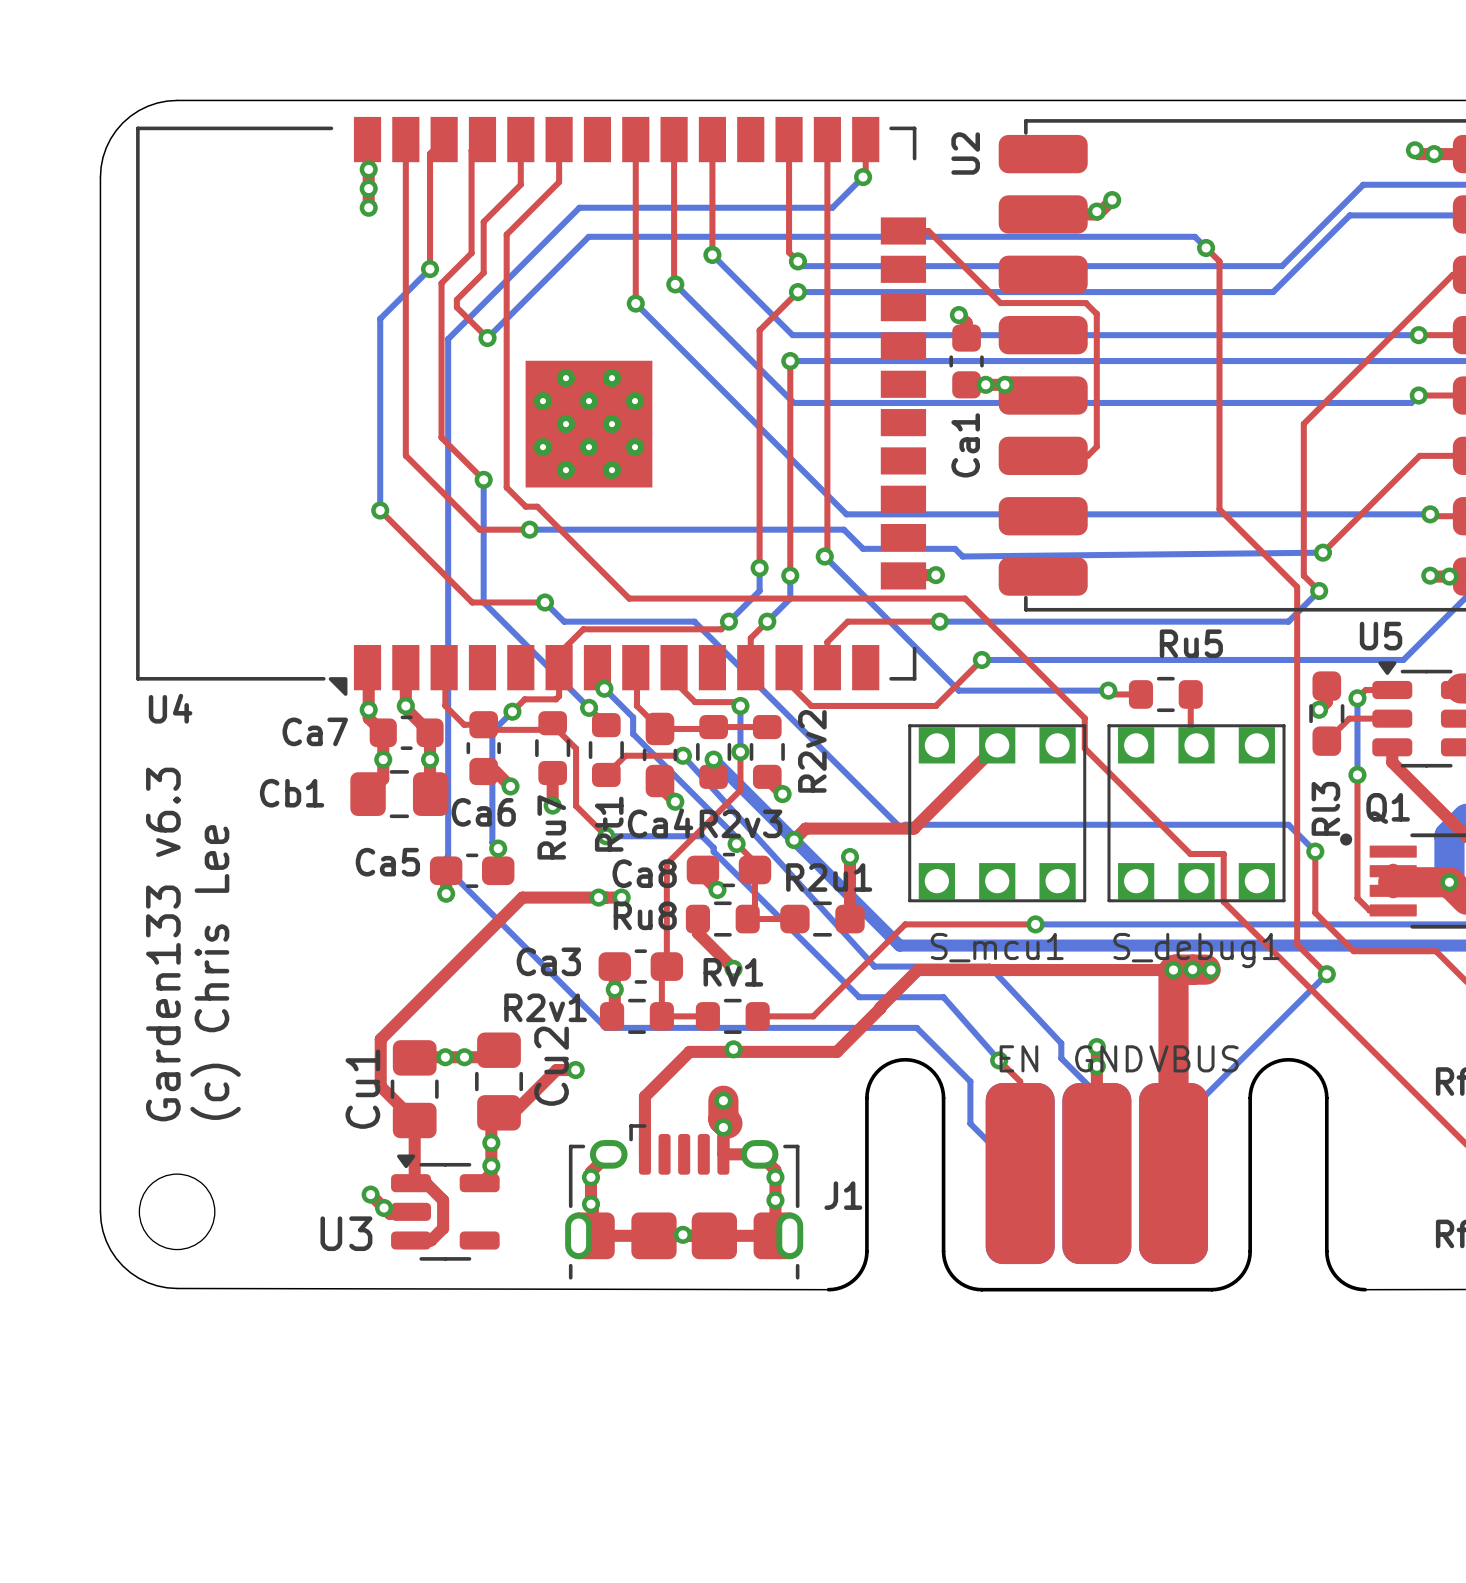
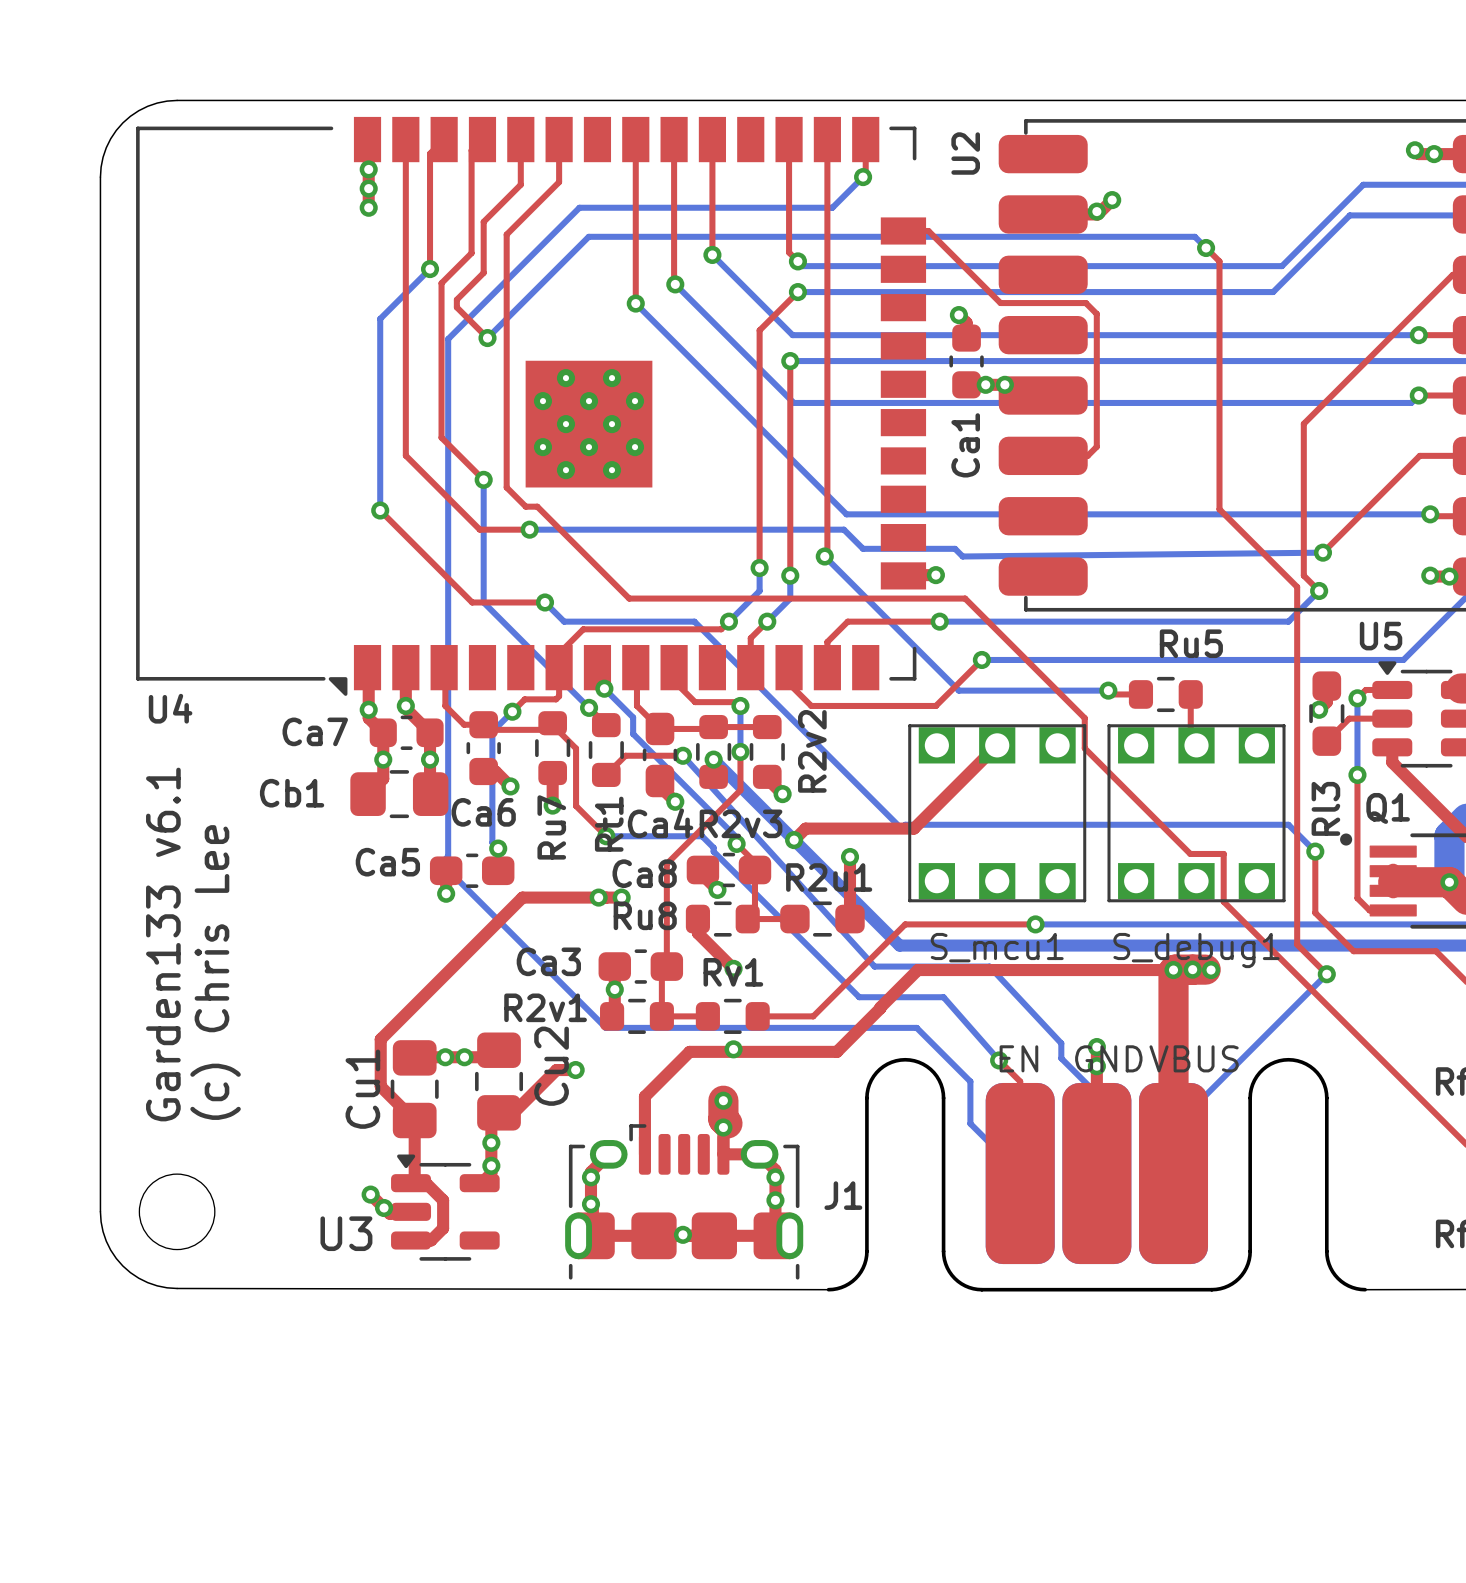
text: Garden133 v6.3 (163, 944) -> Garden133 v6.1 (163, 944)

